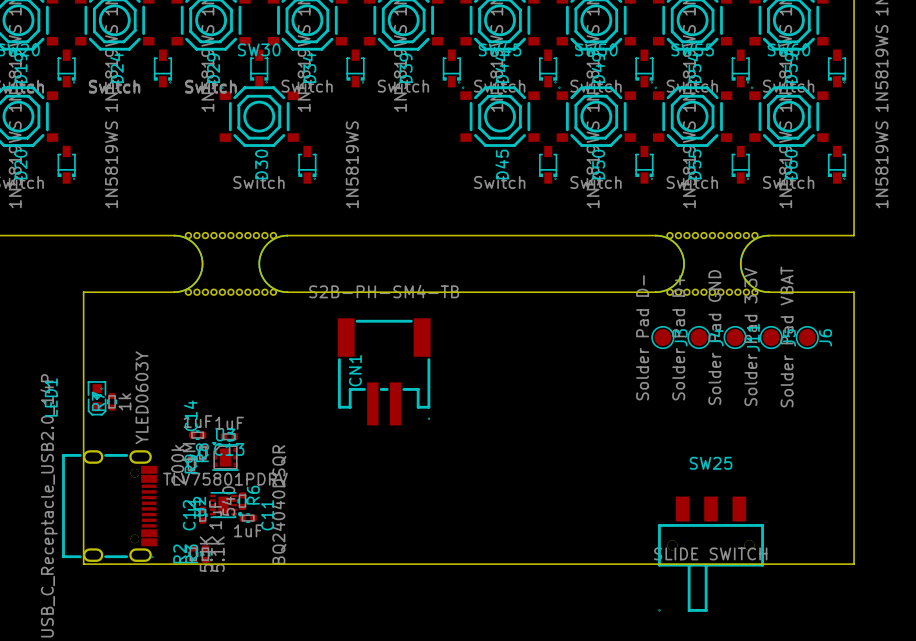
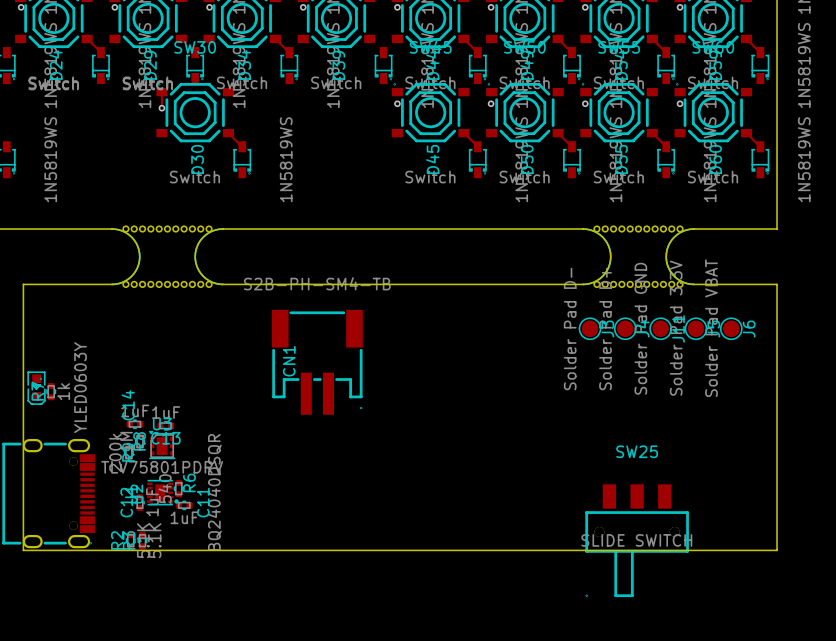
via: none -> (21, 7)
via: none -> (114, 7)
via: none -> (209, 7)
via: none -> (303, 7)
via: none -> (397, 7)
via: none -> (491, 7)
via: none -> (585, 7)
via: none -> (680, 7)
track: none -> (87, 38) (100, 52)
track: none -> (275, 38) (289, 52)
track: none -> (463, 38) (477, 52)
track: none -> (558, 38) (571, 52)
track: none -> (652, 38) (665, 52)
track: none -> (746, 38) (760, 52)
track: none -> (161, 92) (161, 108)
via: none -> (397, 103)
via: none -> (491, 103)
via: none -> (585, 103)
via: none -> (680, 103)
via: none -> (161, 108)
track: none -> (228, 133) (242, 146)
track: none -> (464, 133) (477, 146)
track: none -> (558, 133) (571, 146)
track: none -> (652, 133) (666, 146)
track: none -> (746, 133) (760, 146)

